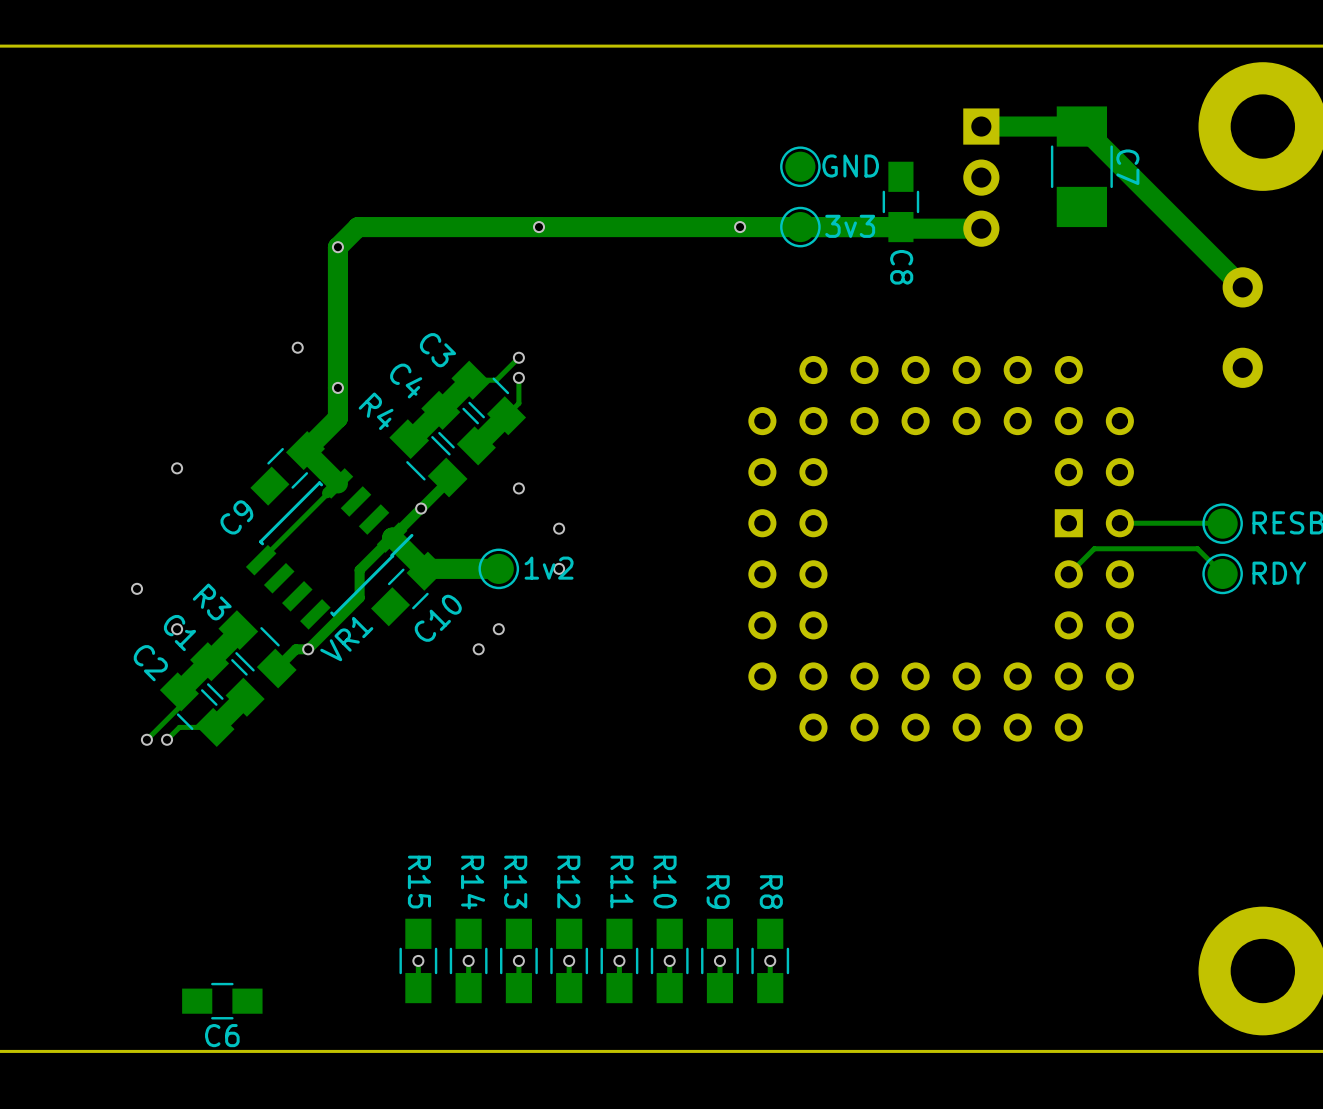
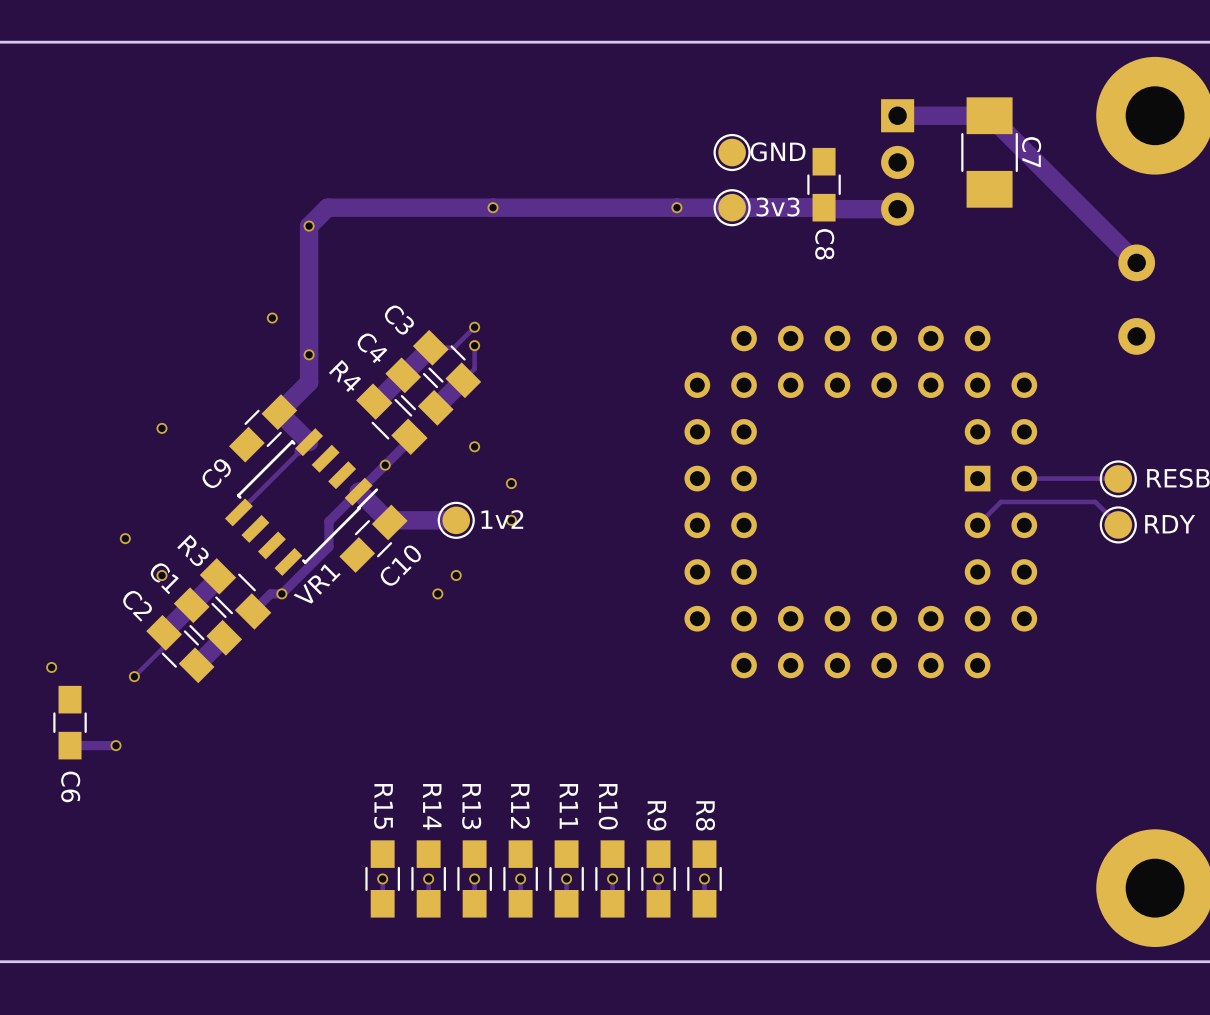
track: (214, 727) (179, 727) (167, 739) -> none
via: none -> (51, 667)
via: (167, 739) -> none
track: none -> (116, 745) (70, 745)
via: none -> (116, 745)
C6 rotation: 0° (222, 1001) -> 90° clockwise (70, 722)
C6 position: (222, 1001) -> (70, 722)

